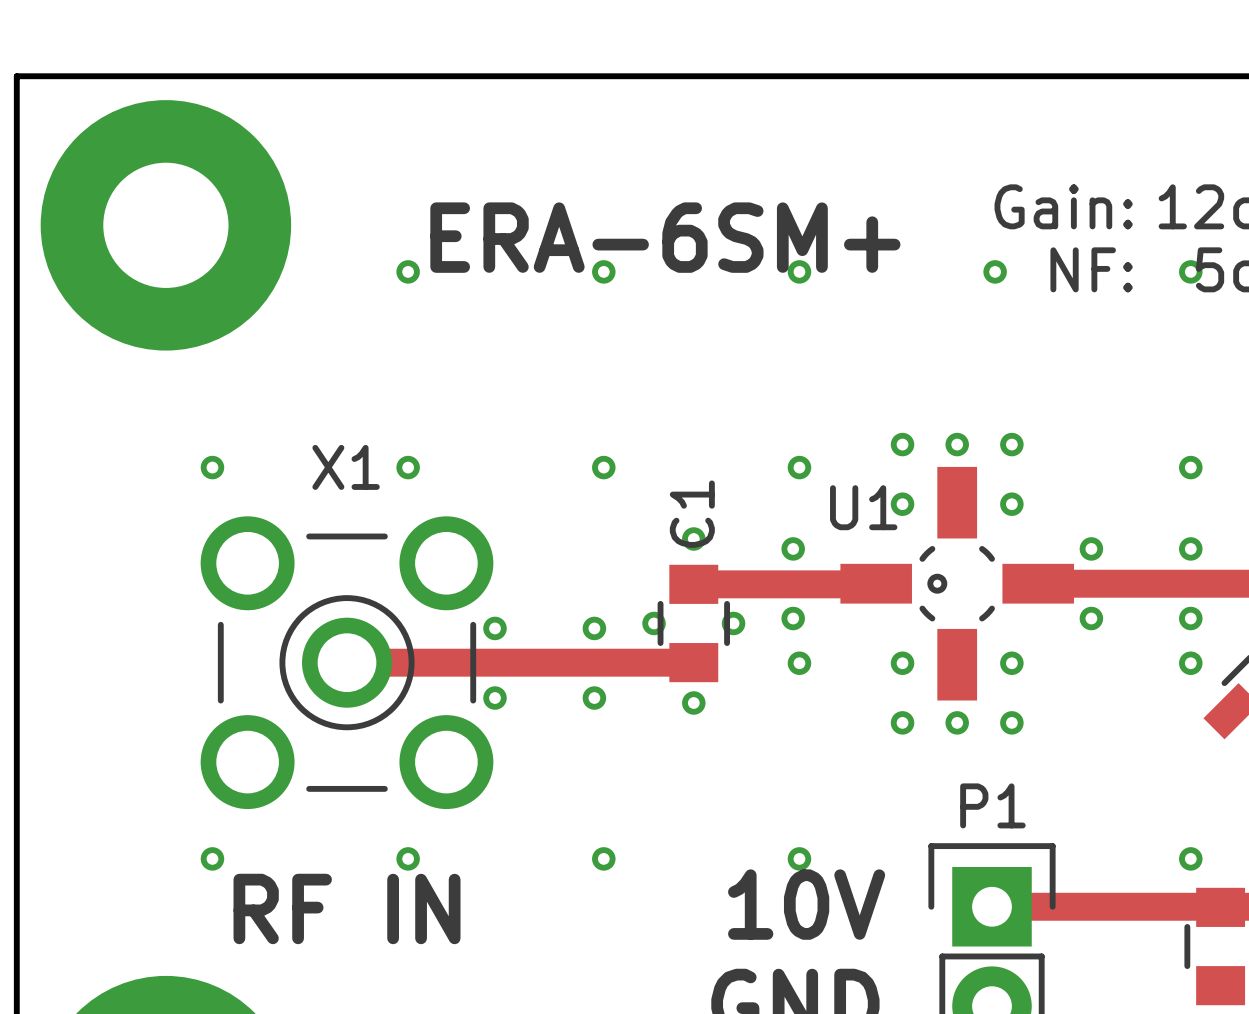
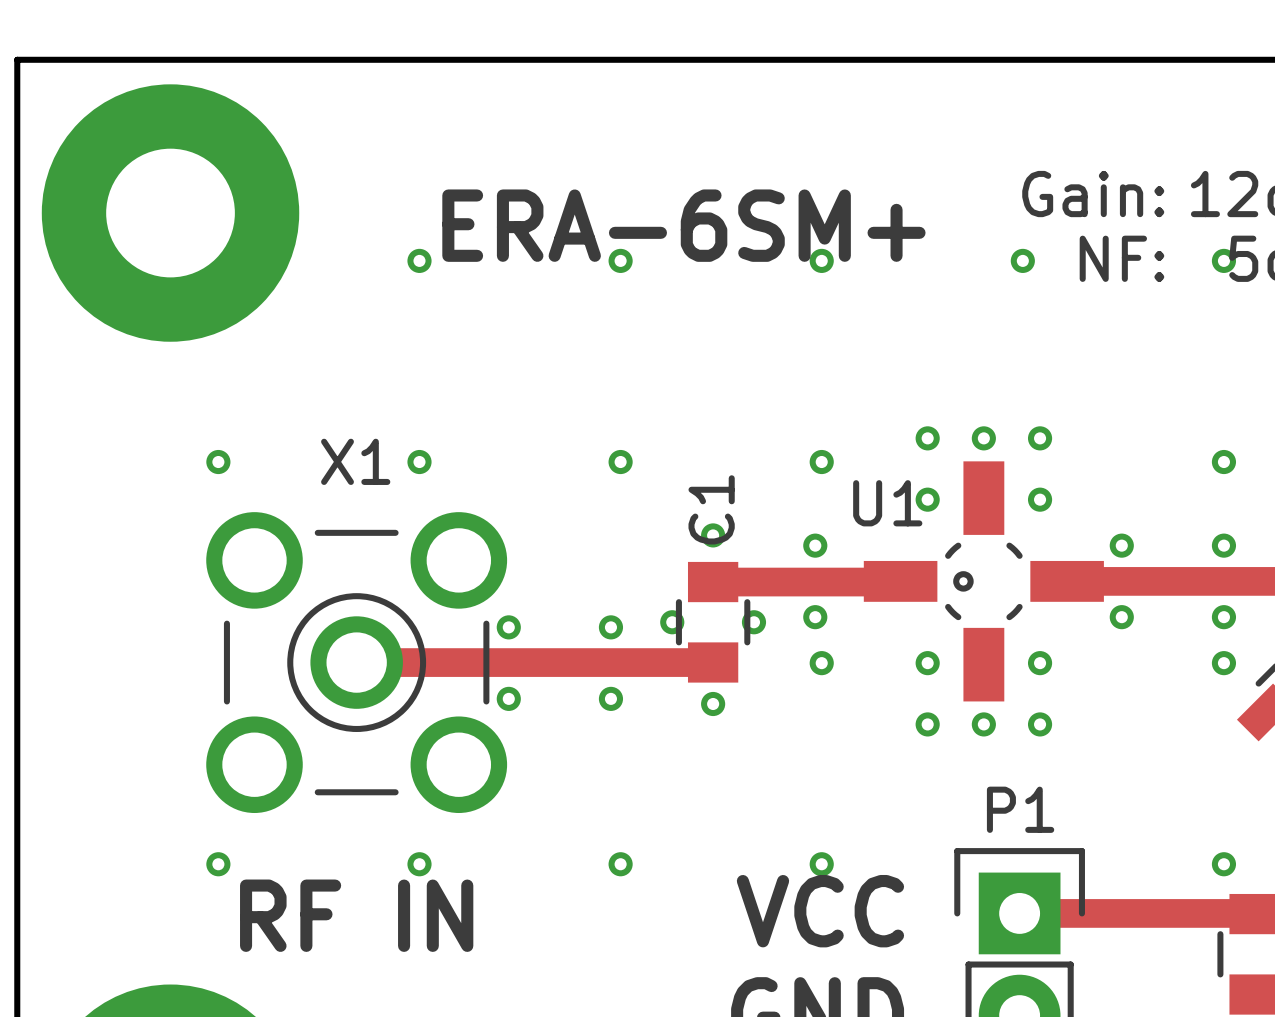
text: 10V (806, 904) -> VCC (820, 911)

